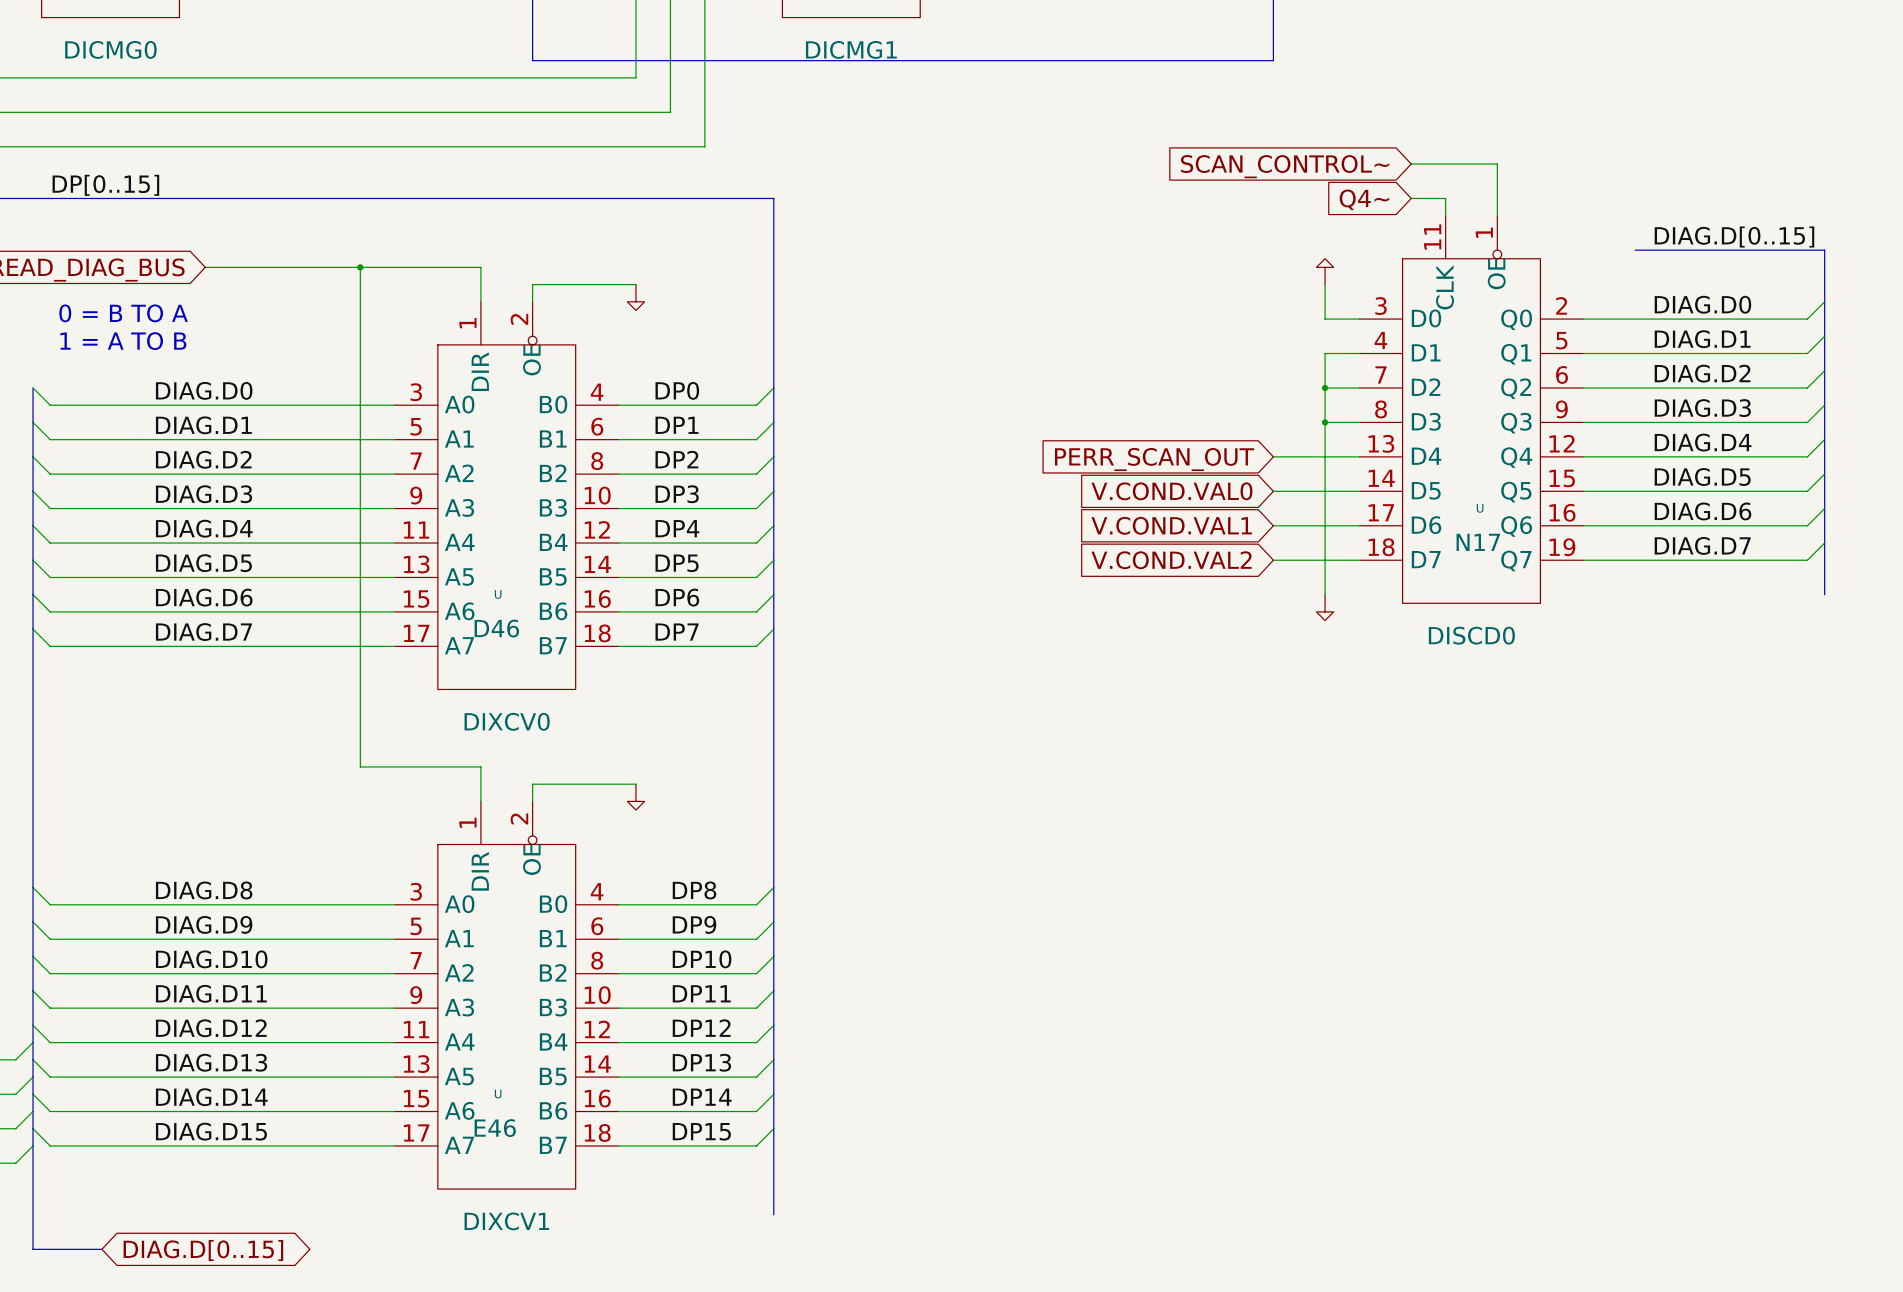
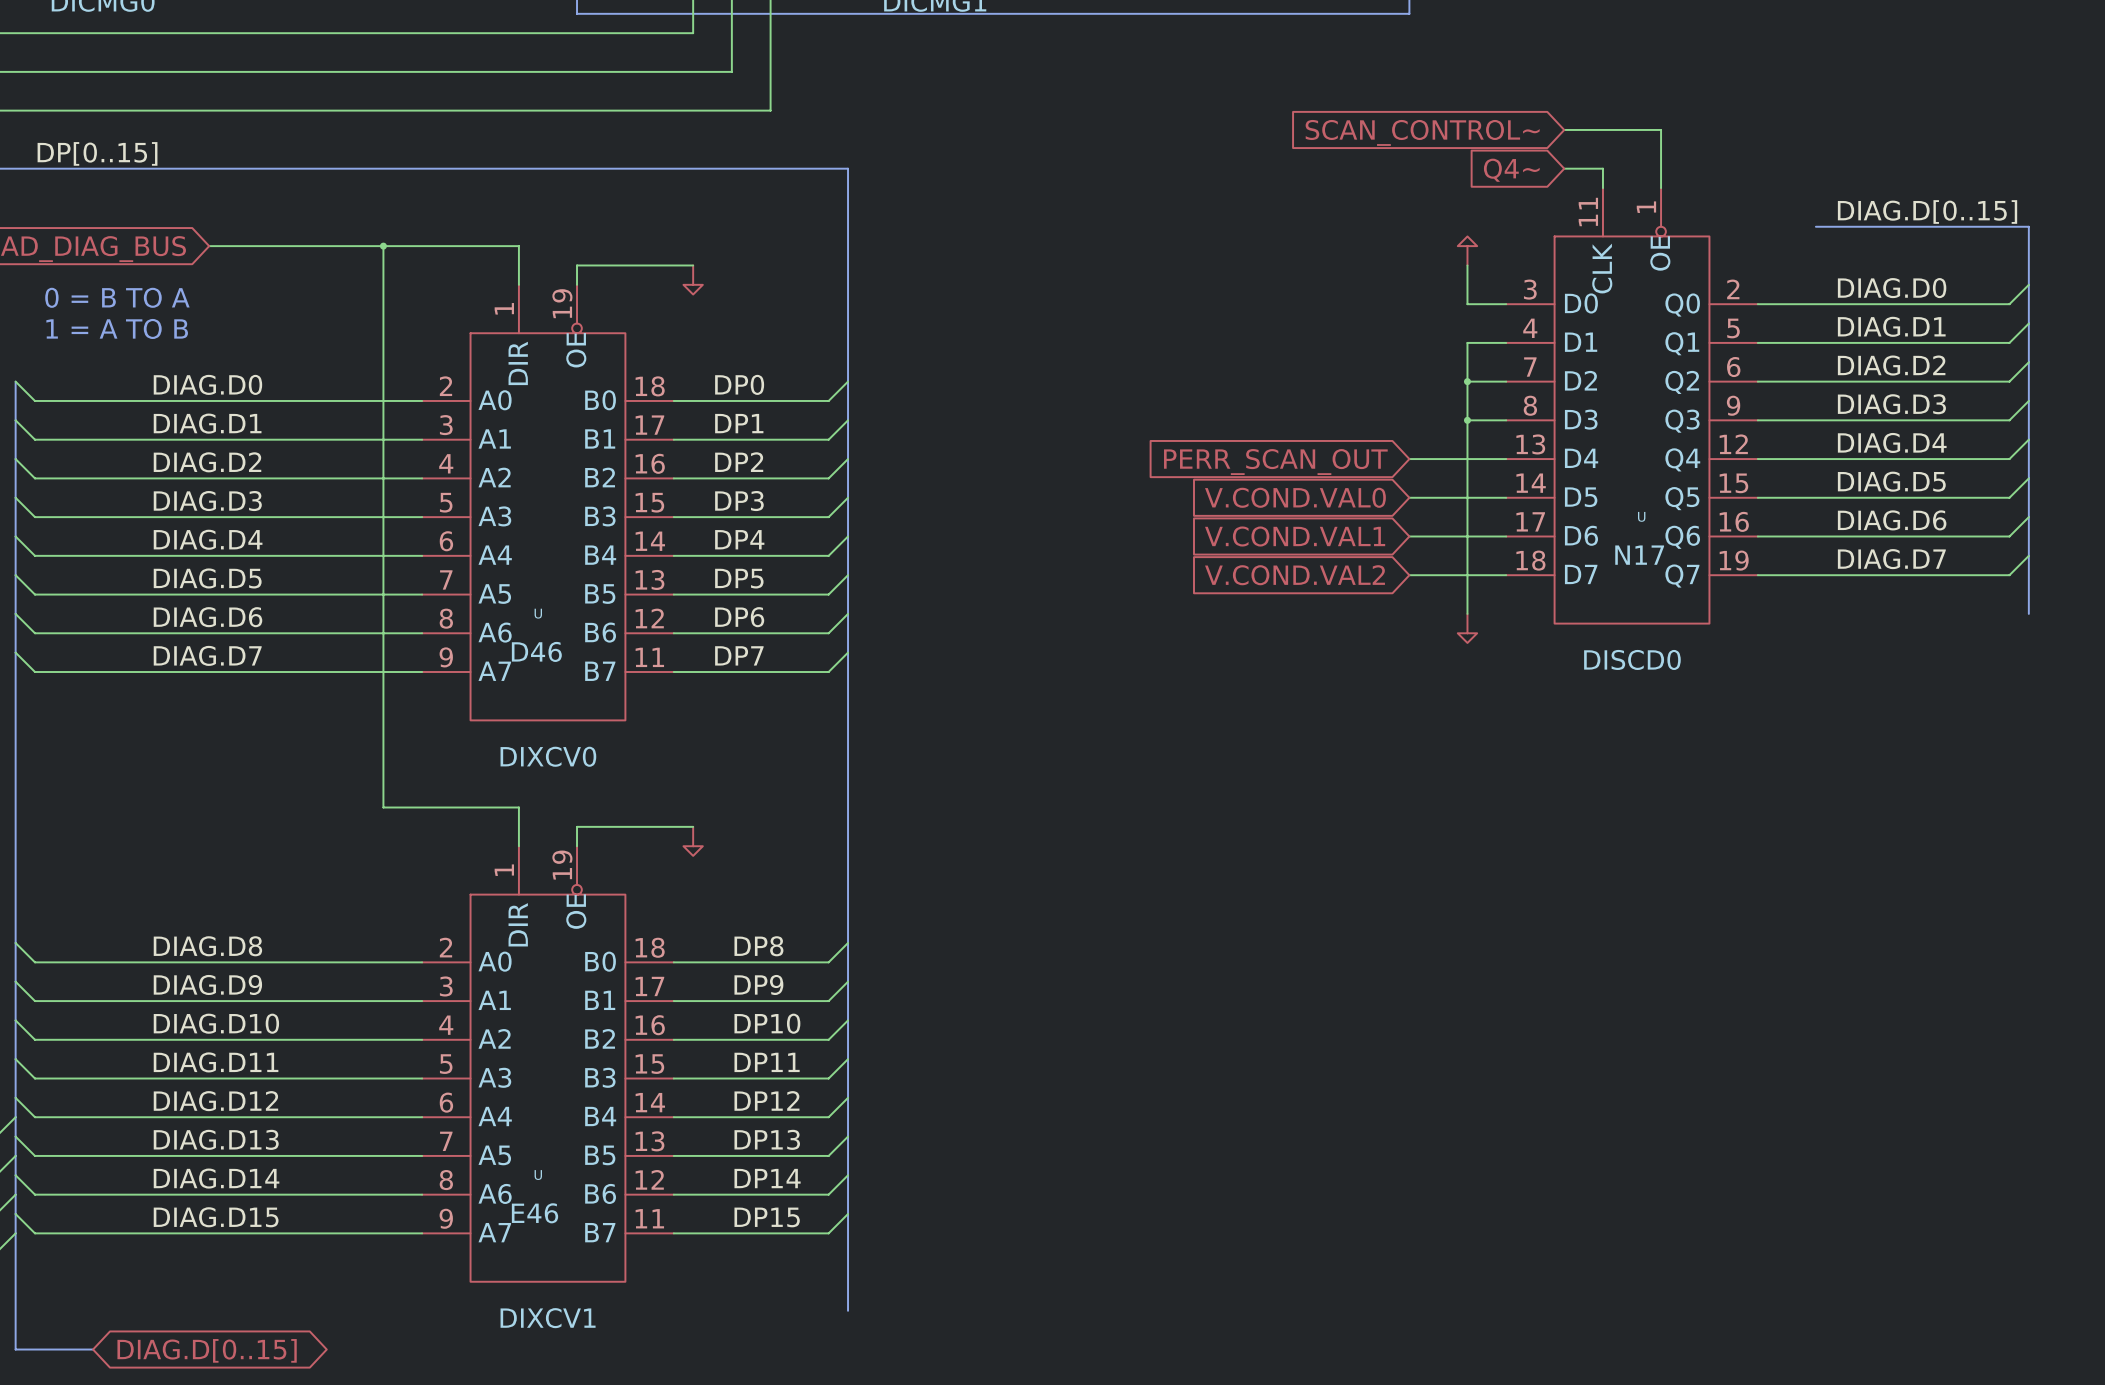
U symbol: [394, 301, 619, 690] -> [422, 284, 674, 721]
U symbol: [394, 801, 619, 1190] -> [422, 846, 674, 1282]

